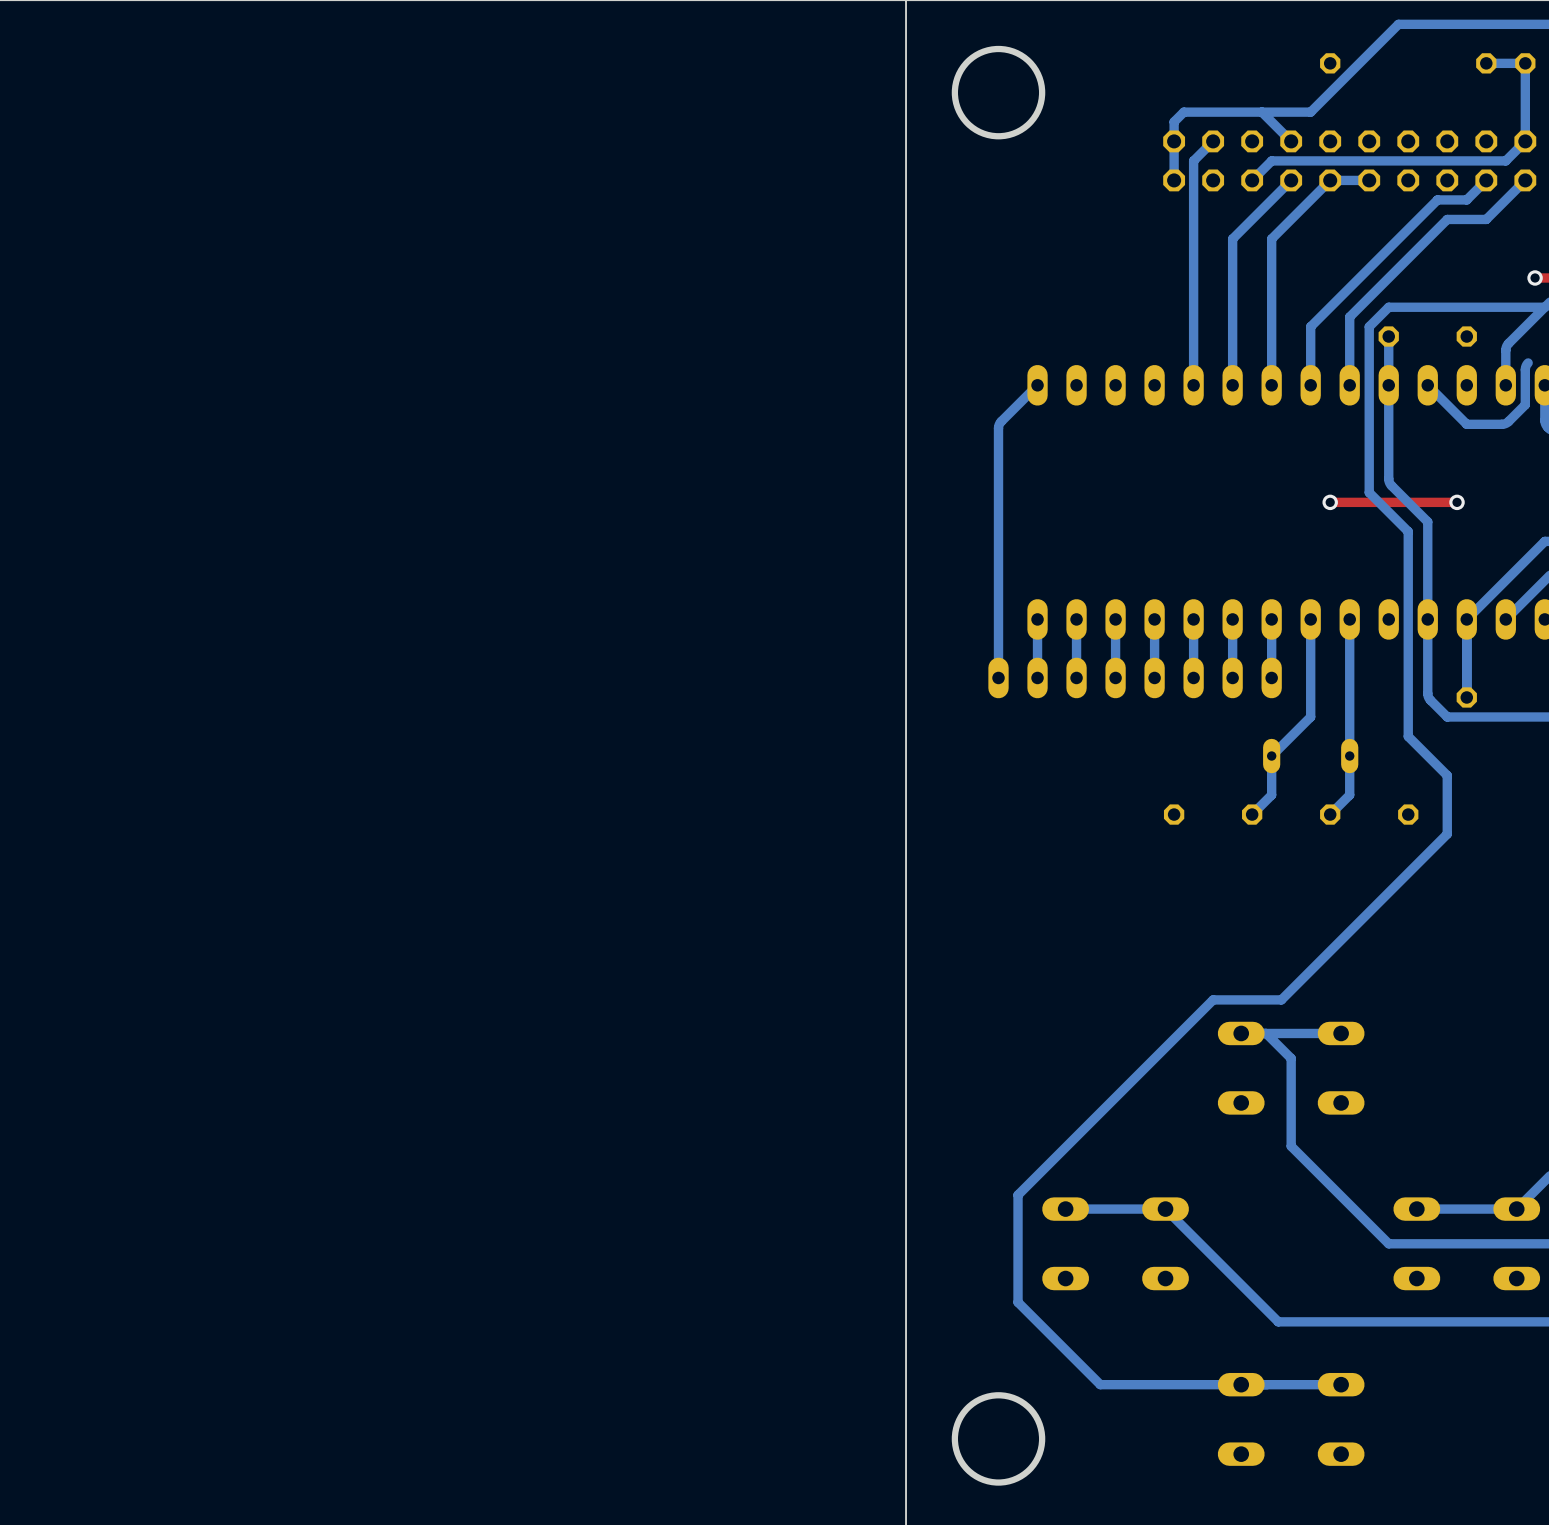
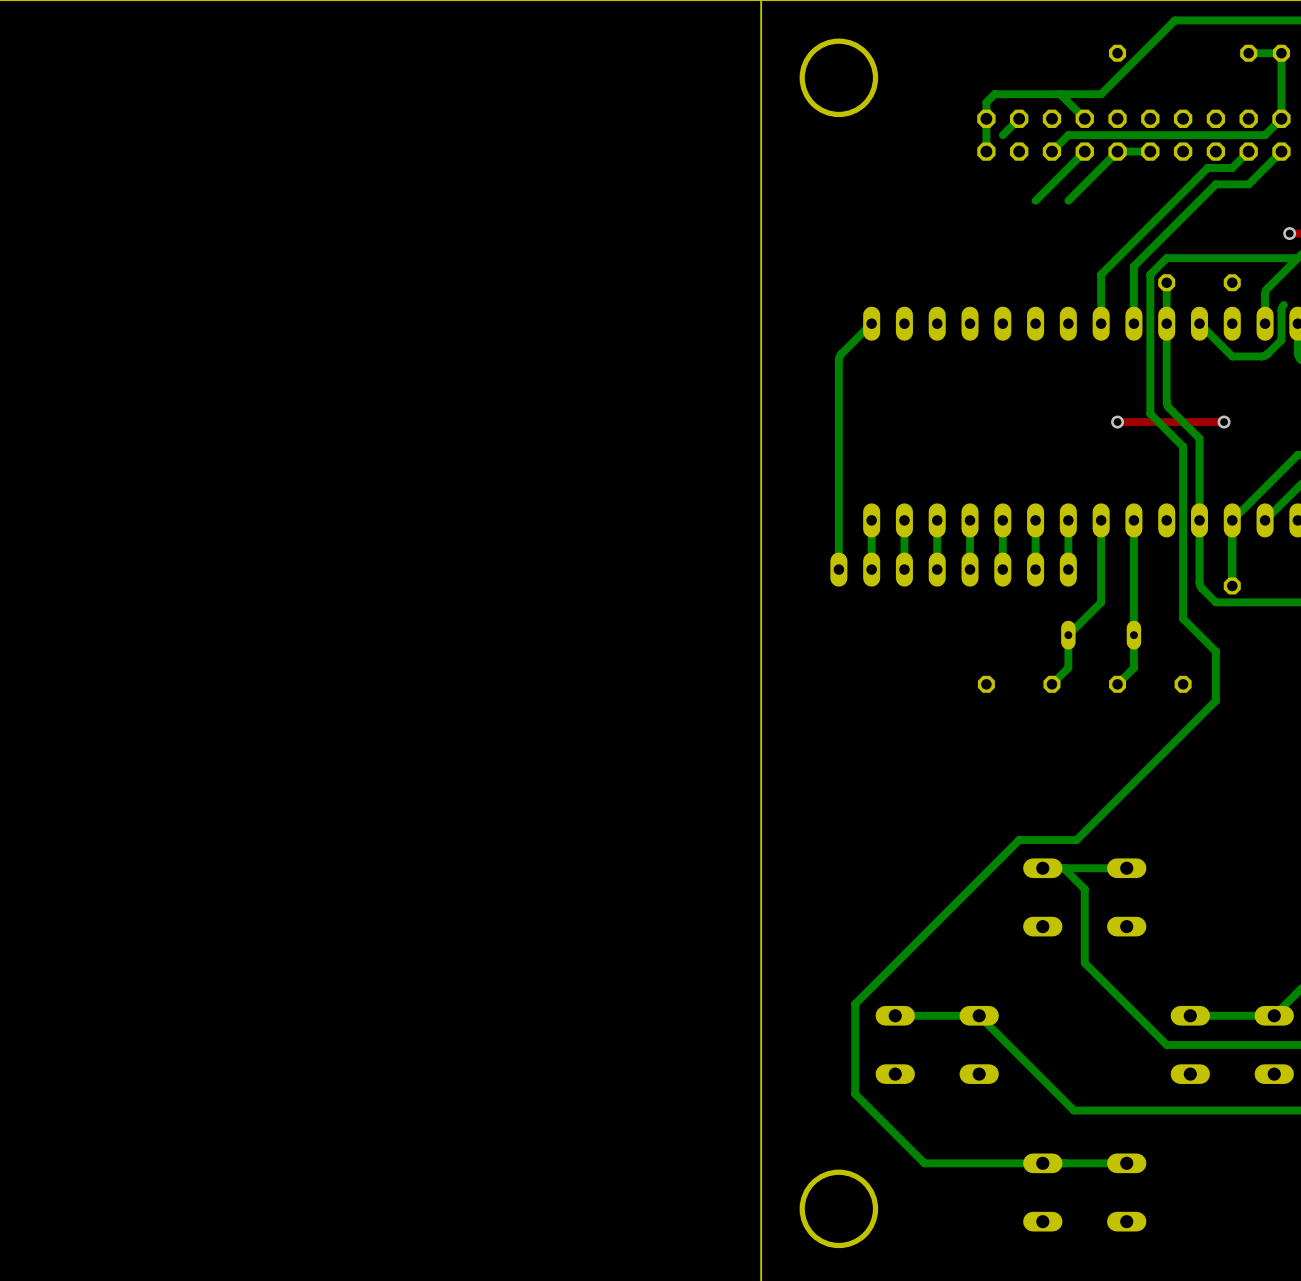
bottom track: (1193, 160) (1193, 385) -> none
bottom track: (1232, 238) (1232, 385) -> none
bottom track: (1271, 238) (1271, 385) -> none

